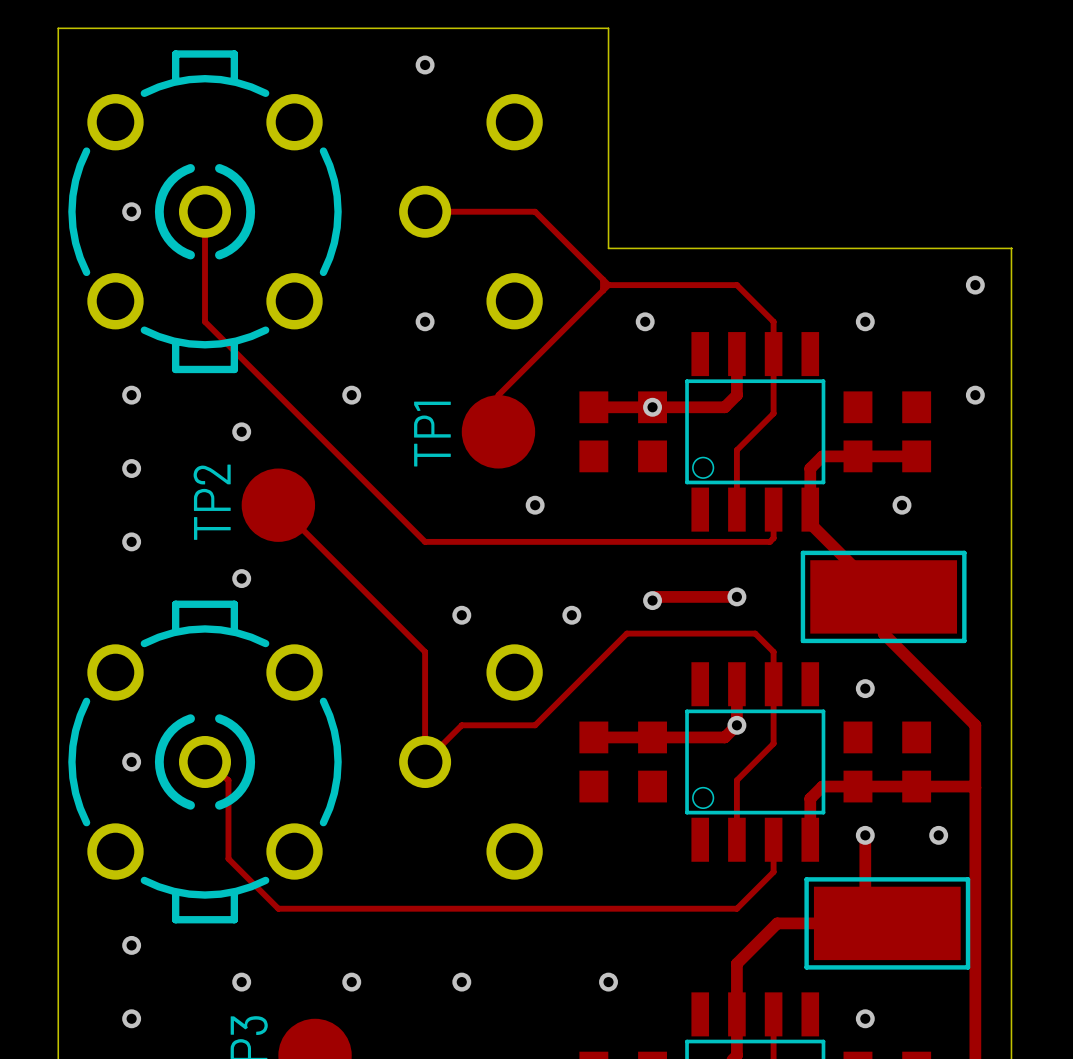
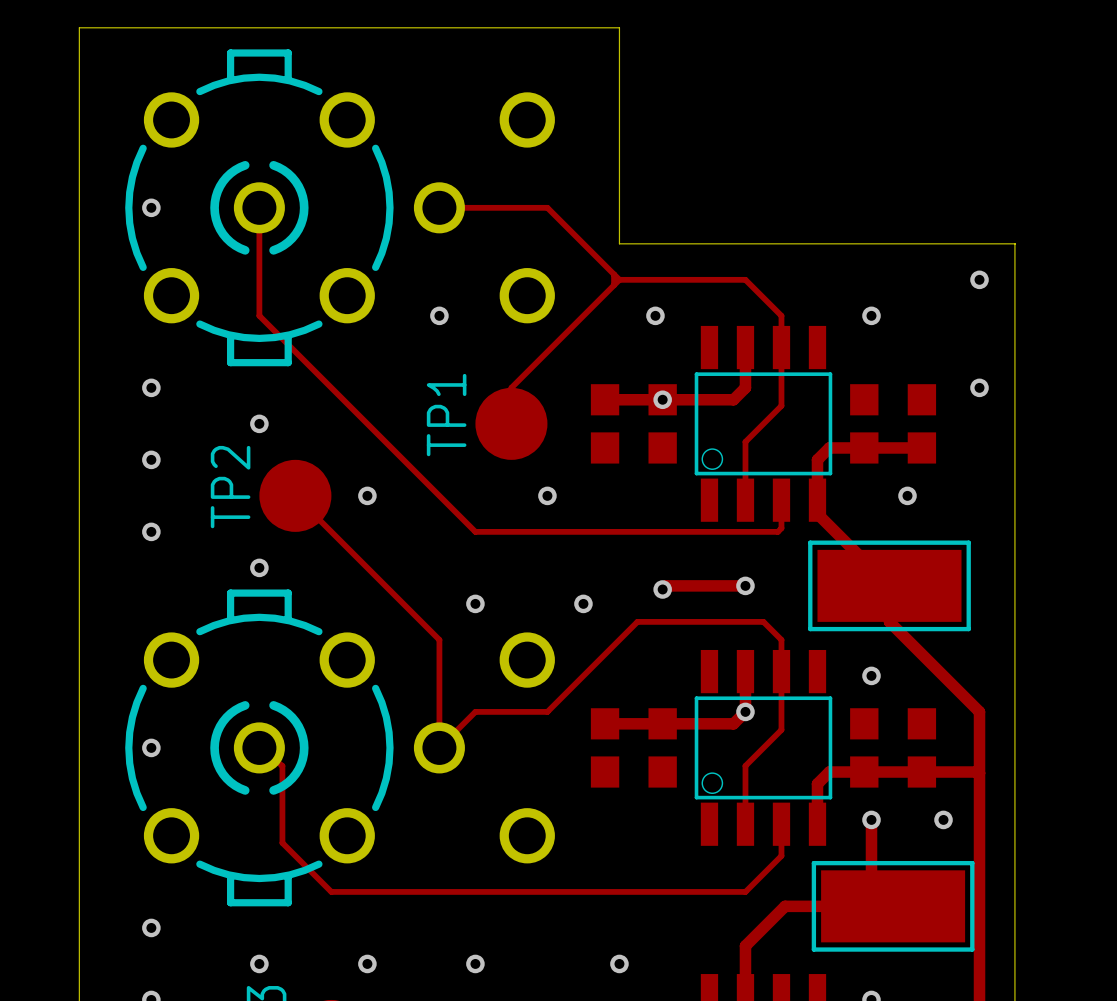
via: (425, 65) -> none
track: (205, 211) (205, 321) (425, 541) (461, 541) -> (259, 207) (259, 315) (475, 531)
part position: (205, 211) -> (259, 207)
via position: (351, 395) -> (367, 495)
track: (205, 761) (228, 780) (228, 858) (278, 908) (315, 908) -> (259, 747) (282, 765) (282, 842) (331, 891)
part position: (205, 761) -> (259, 747)

